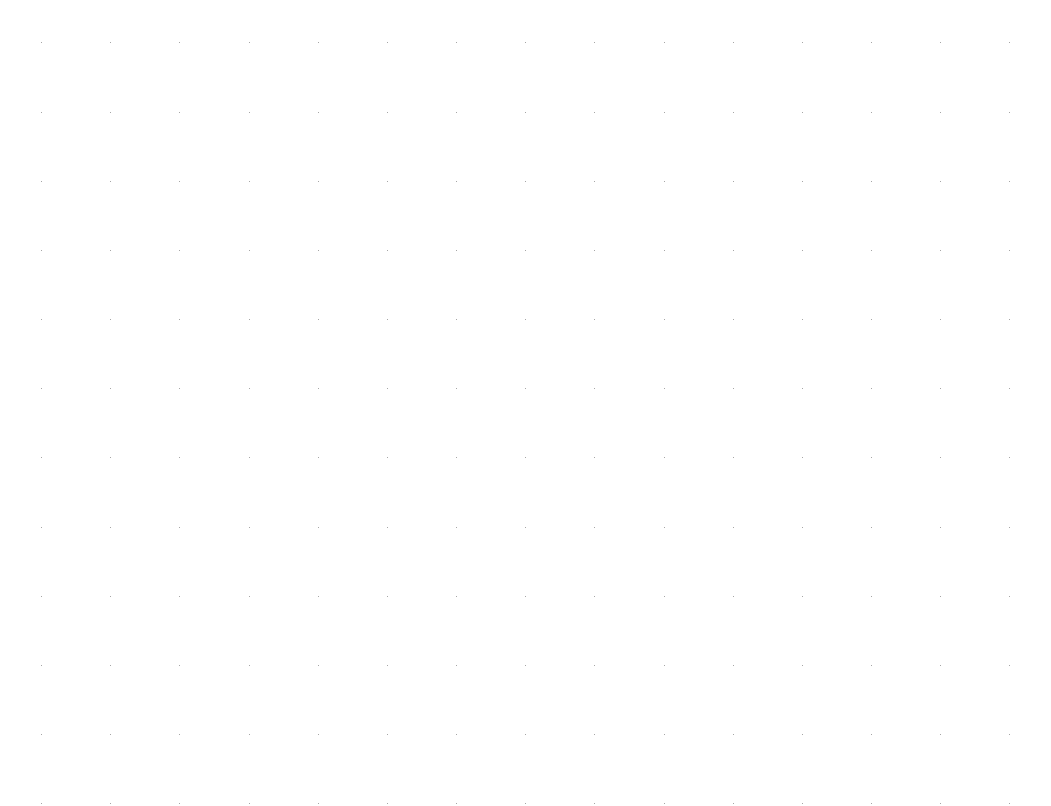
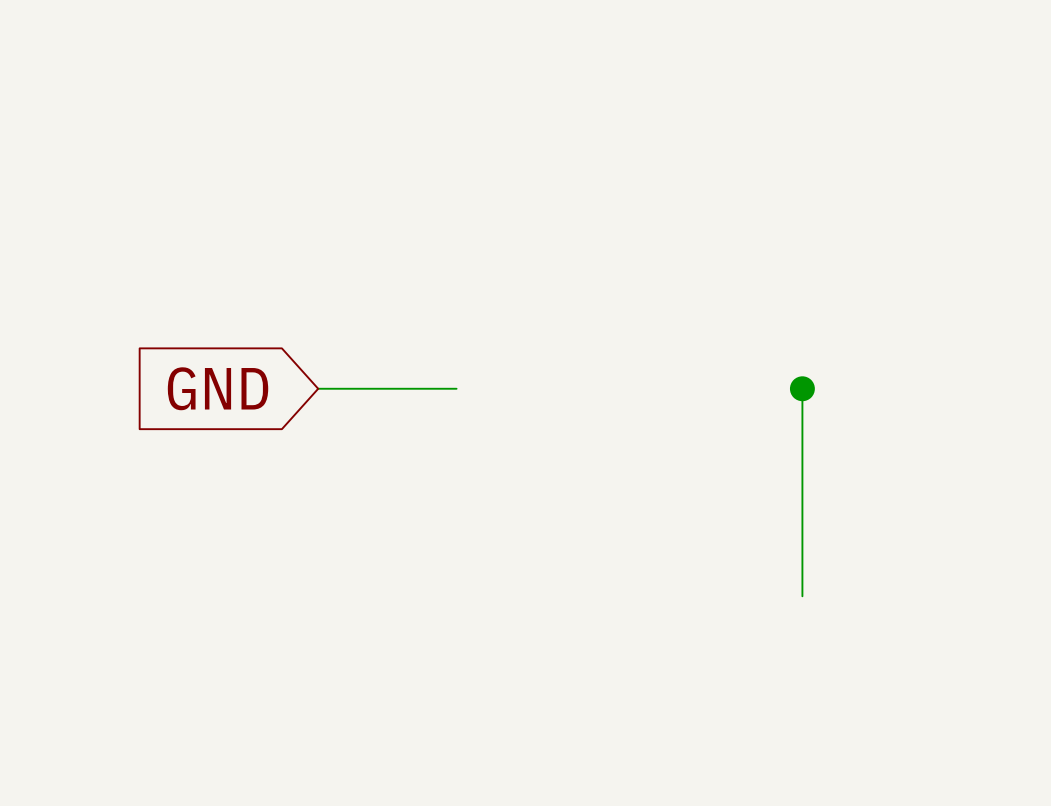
global label: none -> GND (218, 388)
wire: none -> (318, 388) (456, 388)
wire: none -> (802, 388) (802, 596)
junction: none -> (802, 388)

